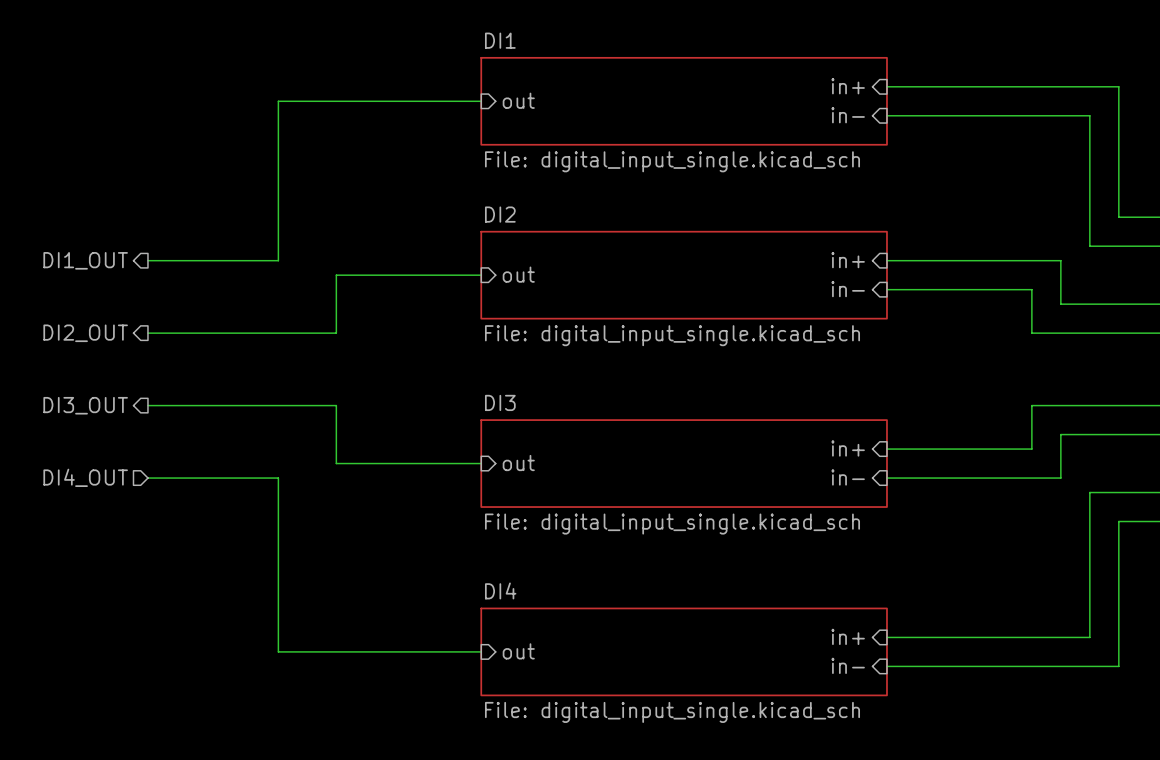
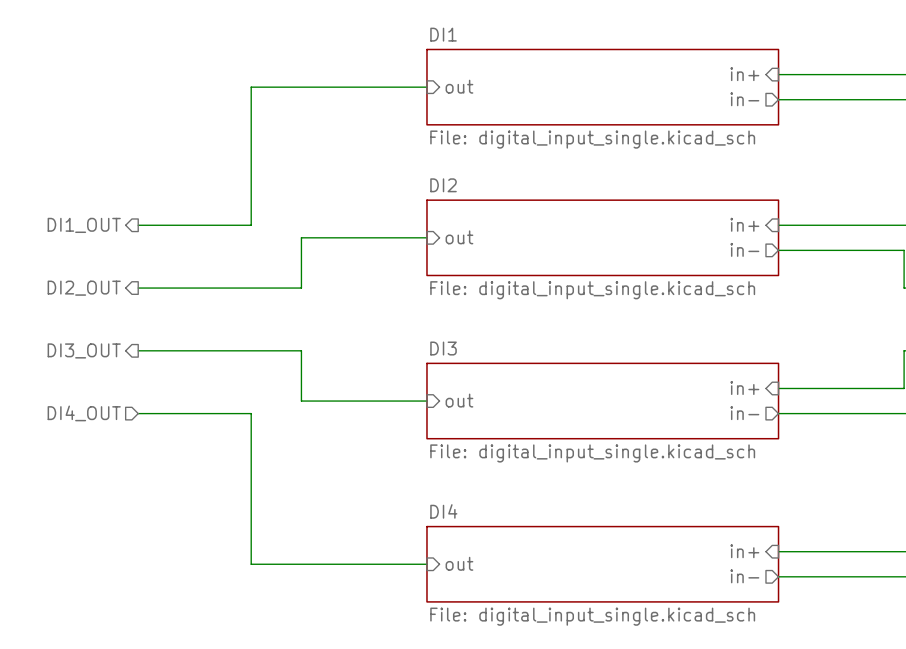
sheet pin shape: input (848, 115) -> output (744, 99)
sheet pin shape: input (848, 289) -> output (744, 249)
sheet pin shape: input (848, 477) -> output (744, 413)
sheet pin shape: input (848, 665) -> output (744, 576)

